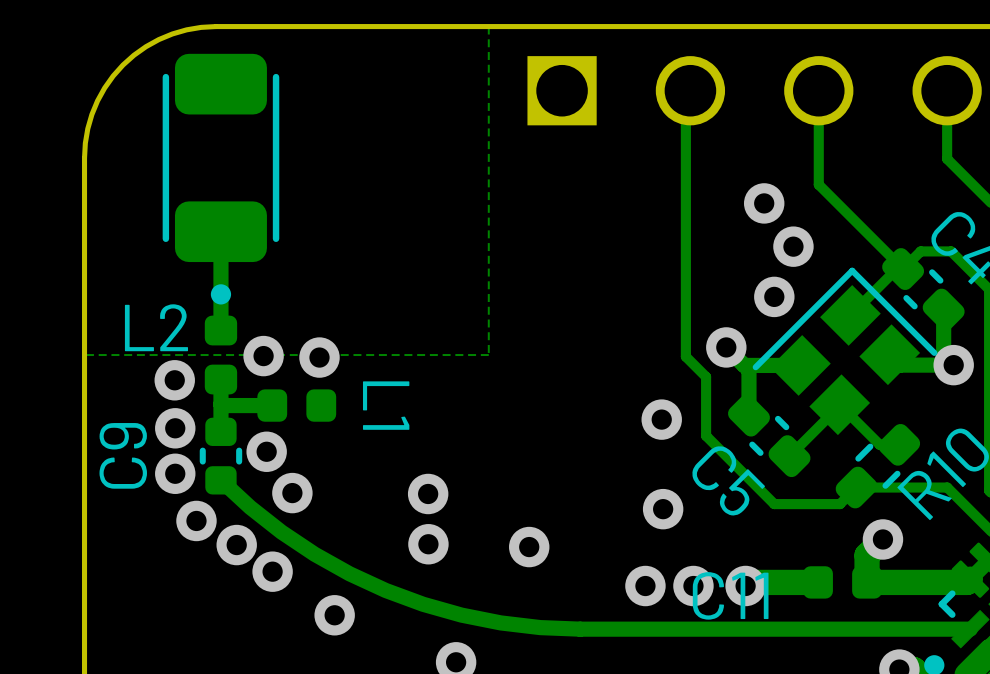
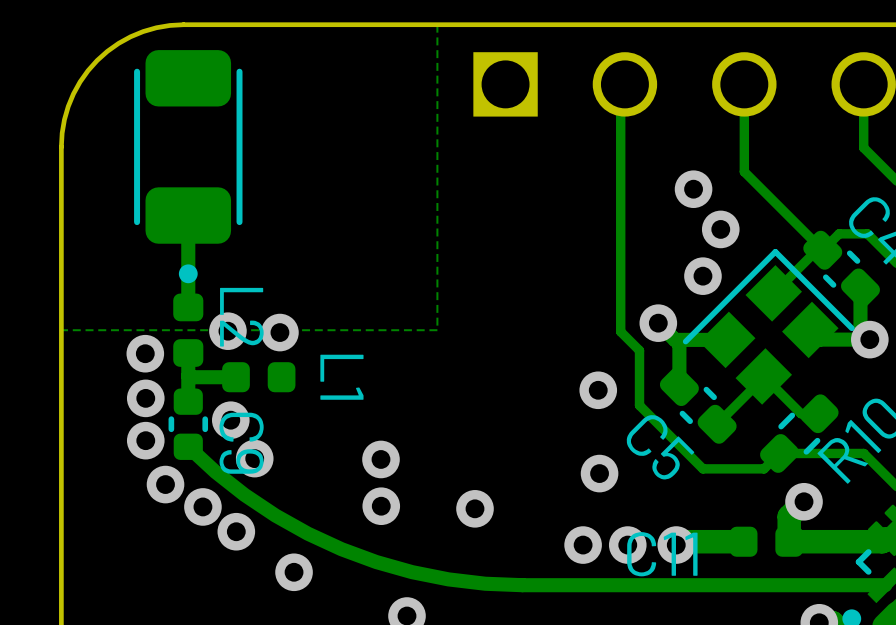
L2 name rotation: 0° (156, 327) -> 90° clockwise (241, 317)
L2 name position: L2 (156, 327) -> L2 (241, 317)
C9 name rotation: 0° (123, 455) -> 180° (241, 443)
C9 name position: C9 (123, 455) -> C9 (241, 443)

